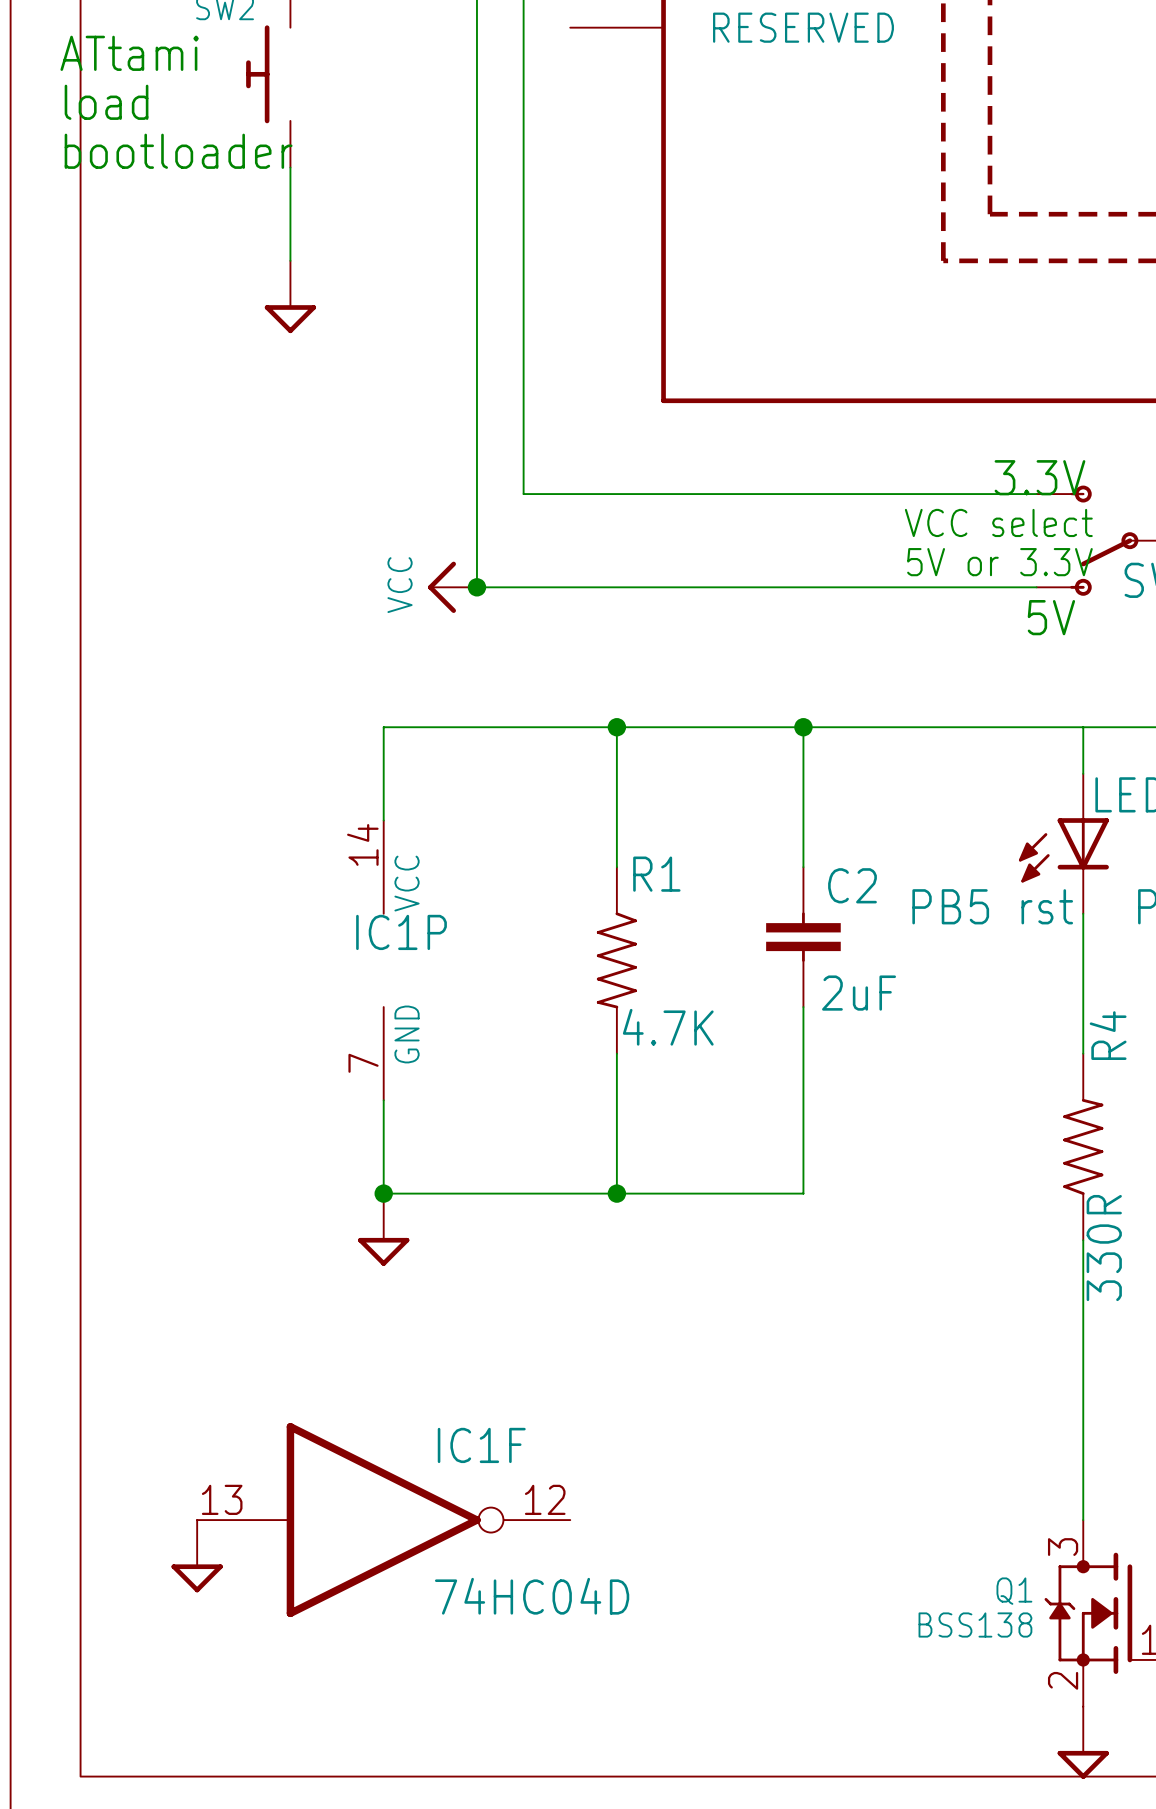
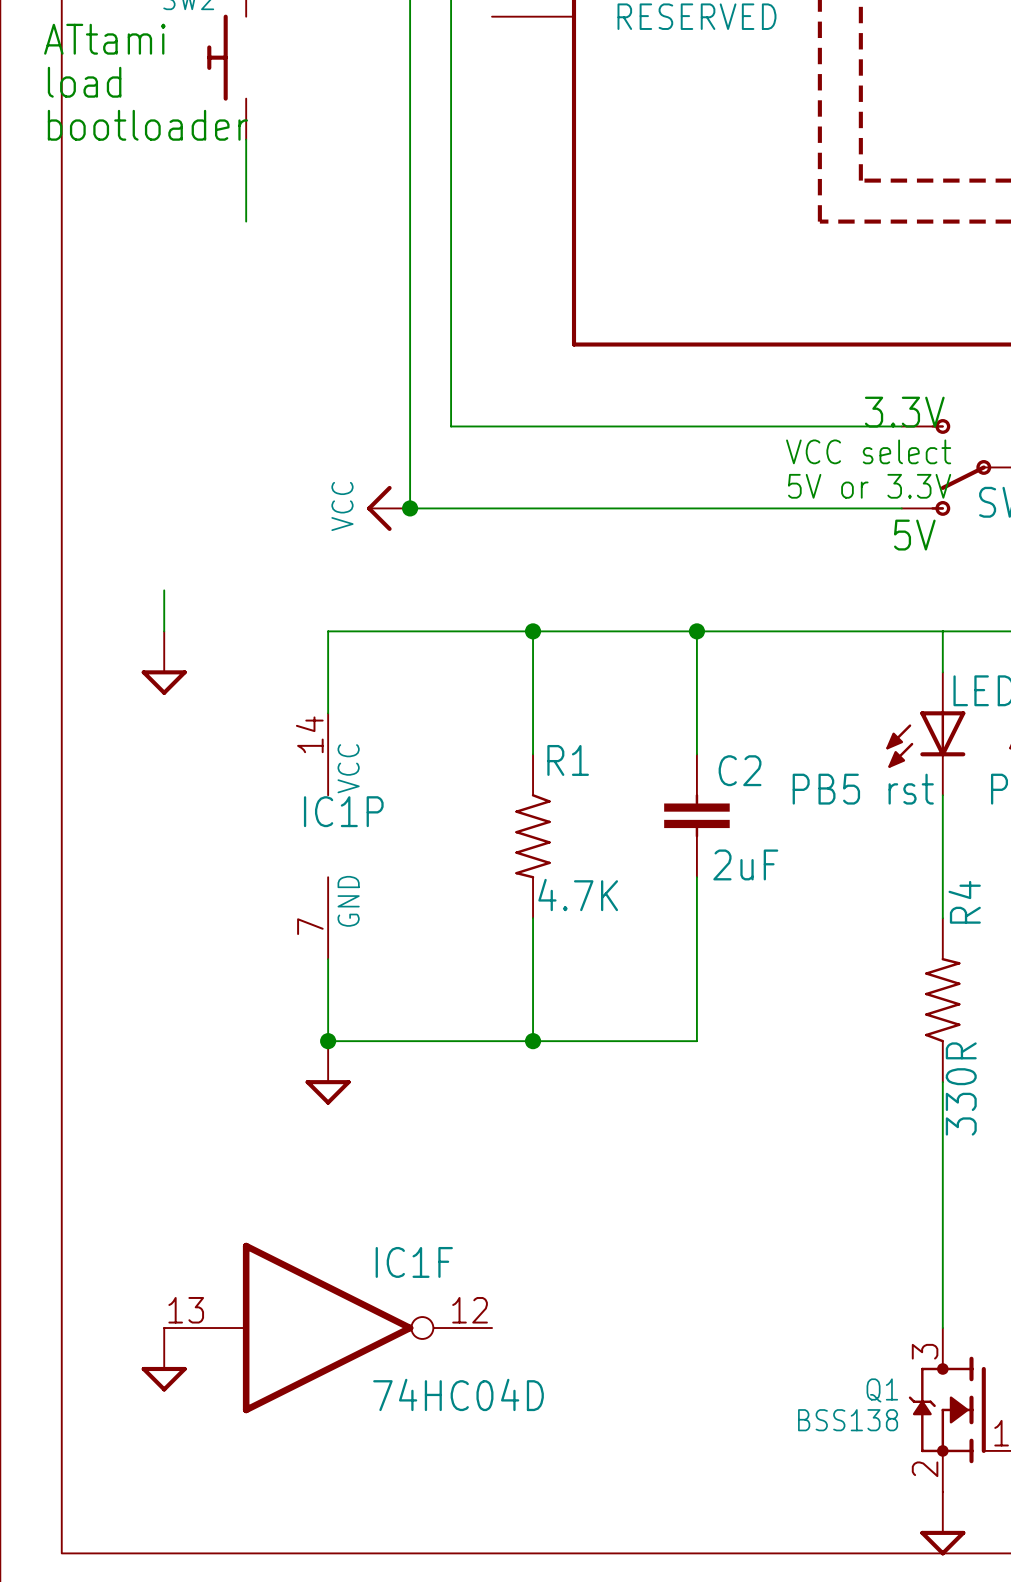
power symbol: (290, 297) -> none
wire: none -> (164, 590) (164, 631)
power symbol: none -> (164, 663)

